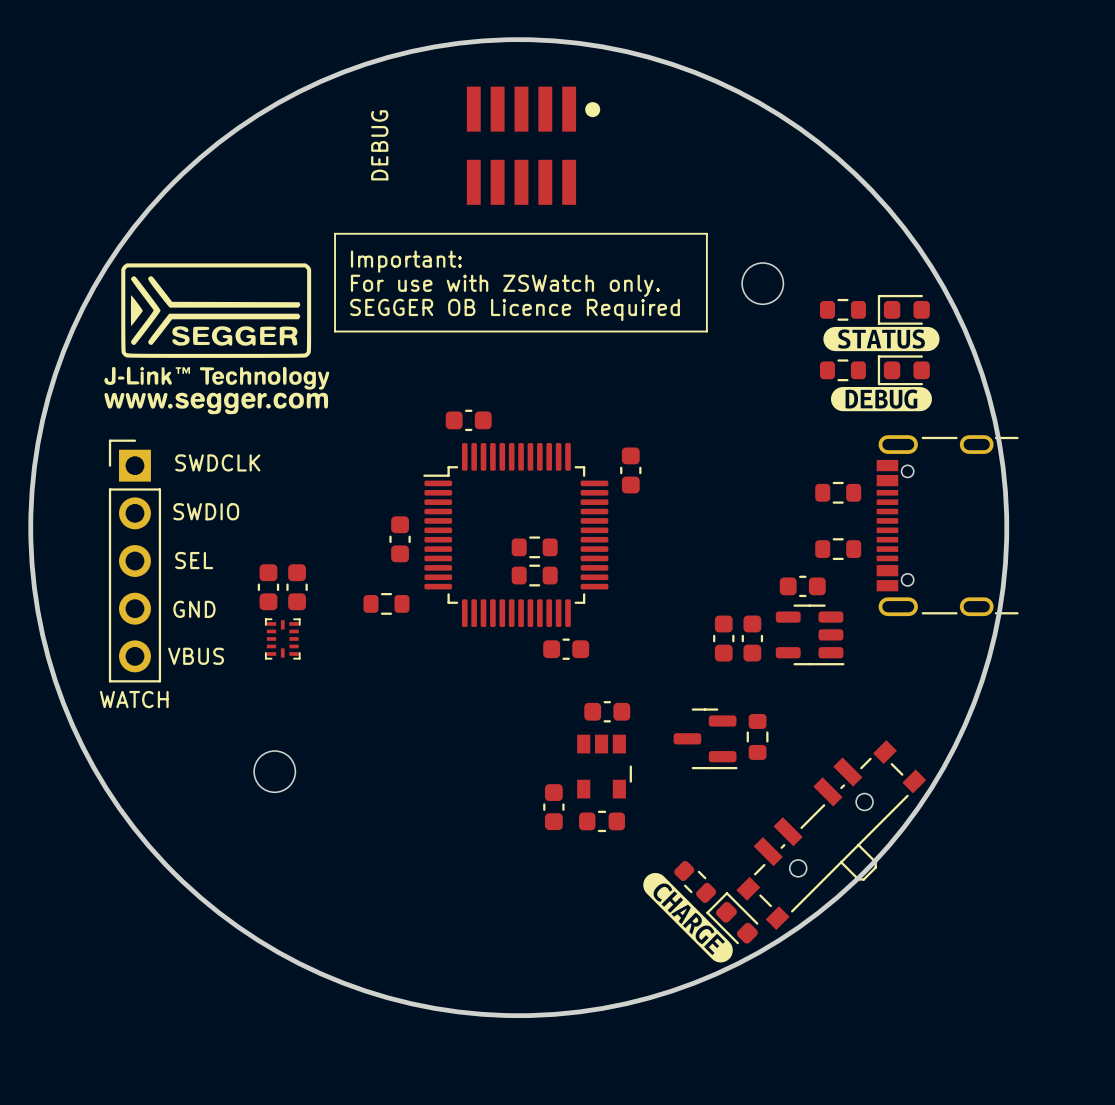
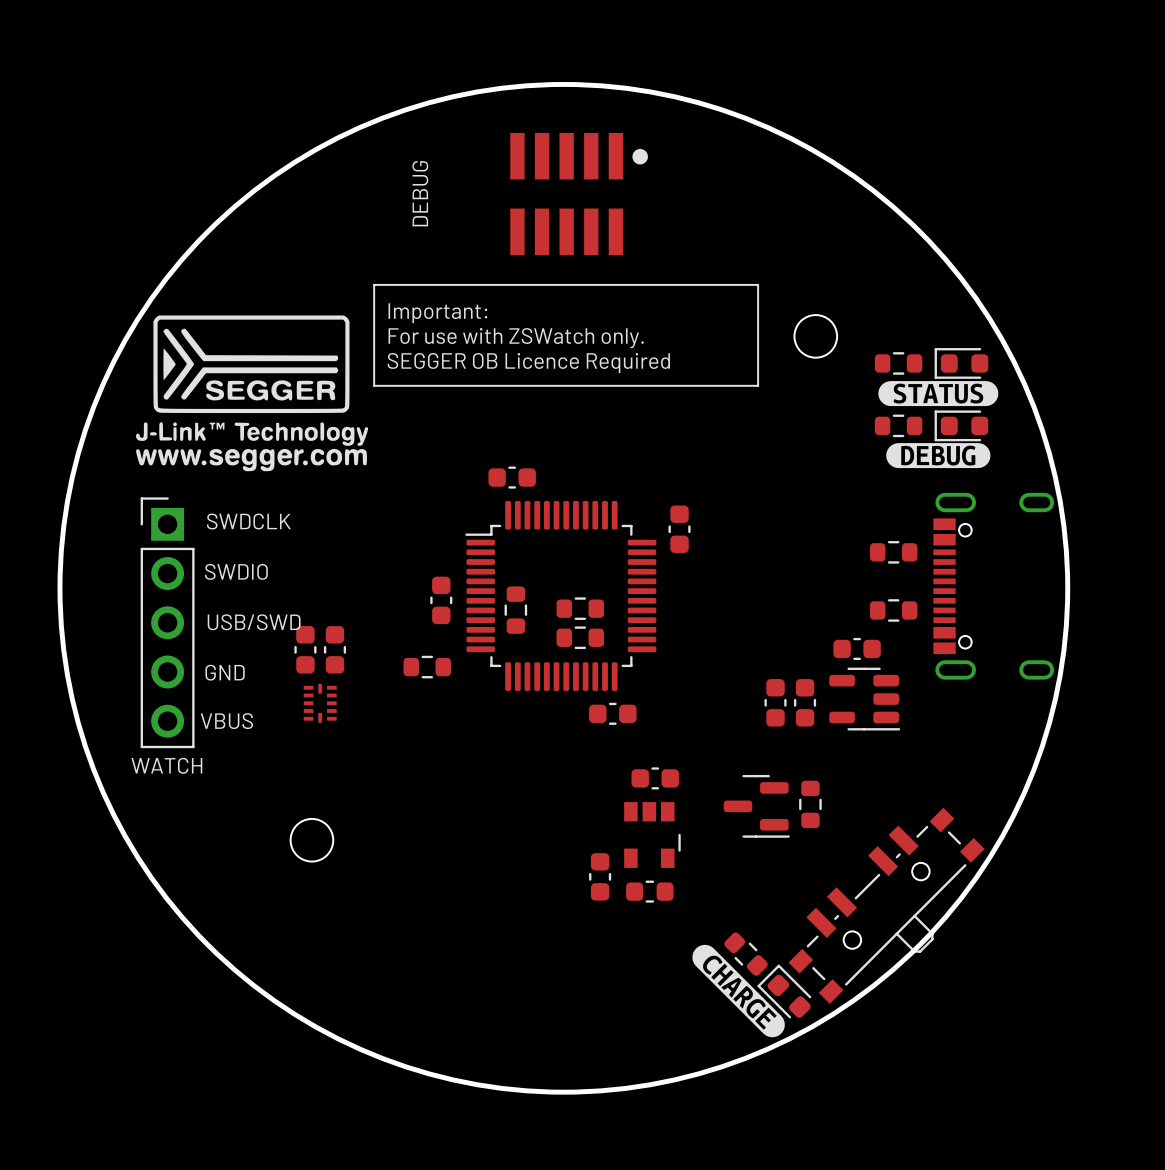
part footprint: [876, 435, 1019, 617] -> [933, 492, 1055, 680]
part: none -> (515, 610)
text: SEL (194, 560) -> USB/SWD (254, 622)
part footprint: [264, 618, 301, 660] -> [303, 683, 337, 723]

